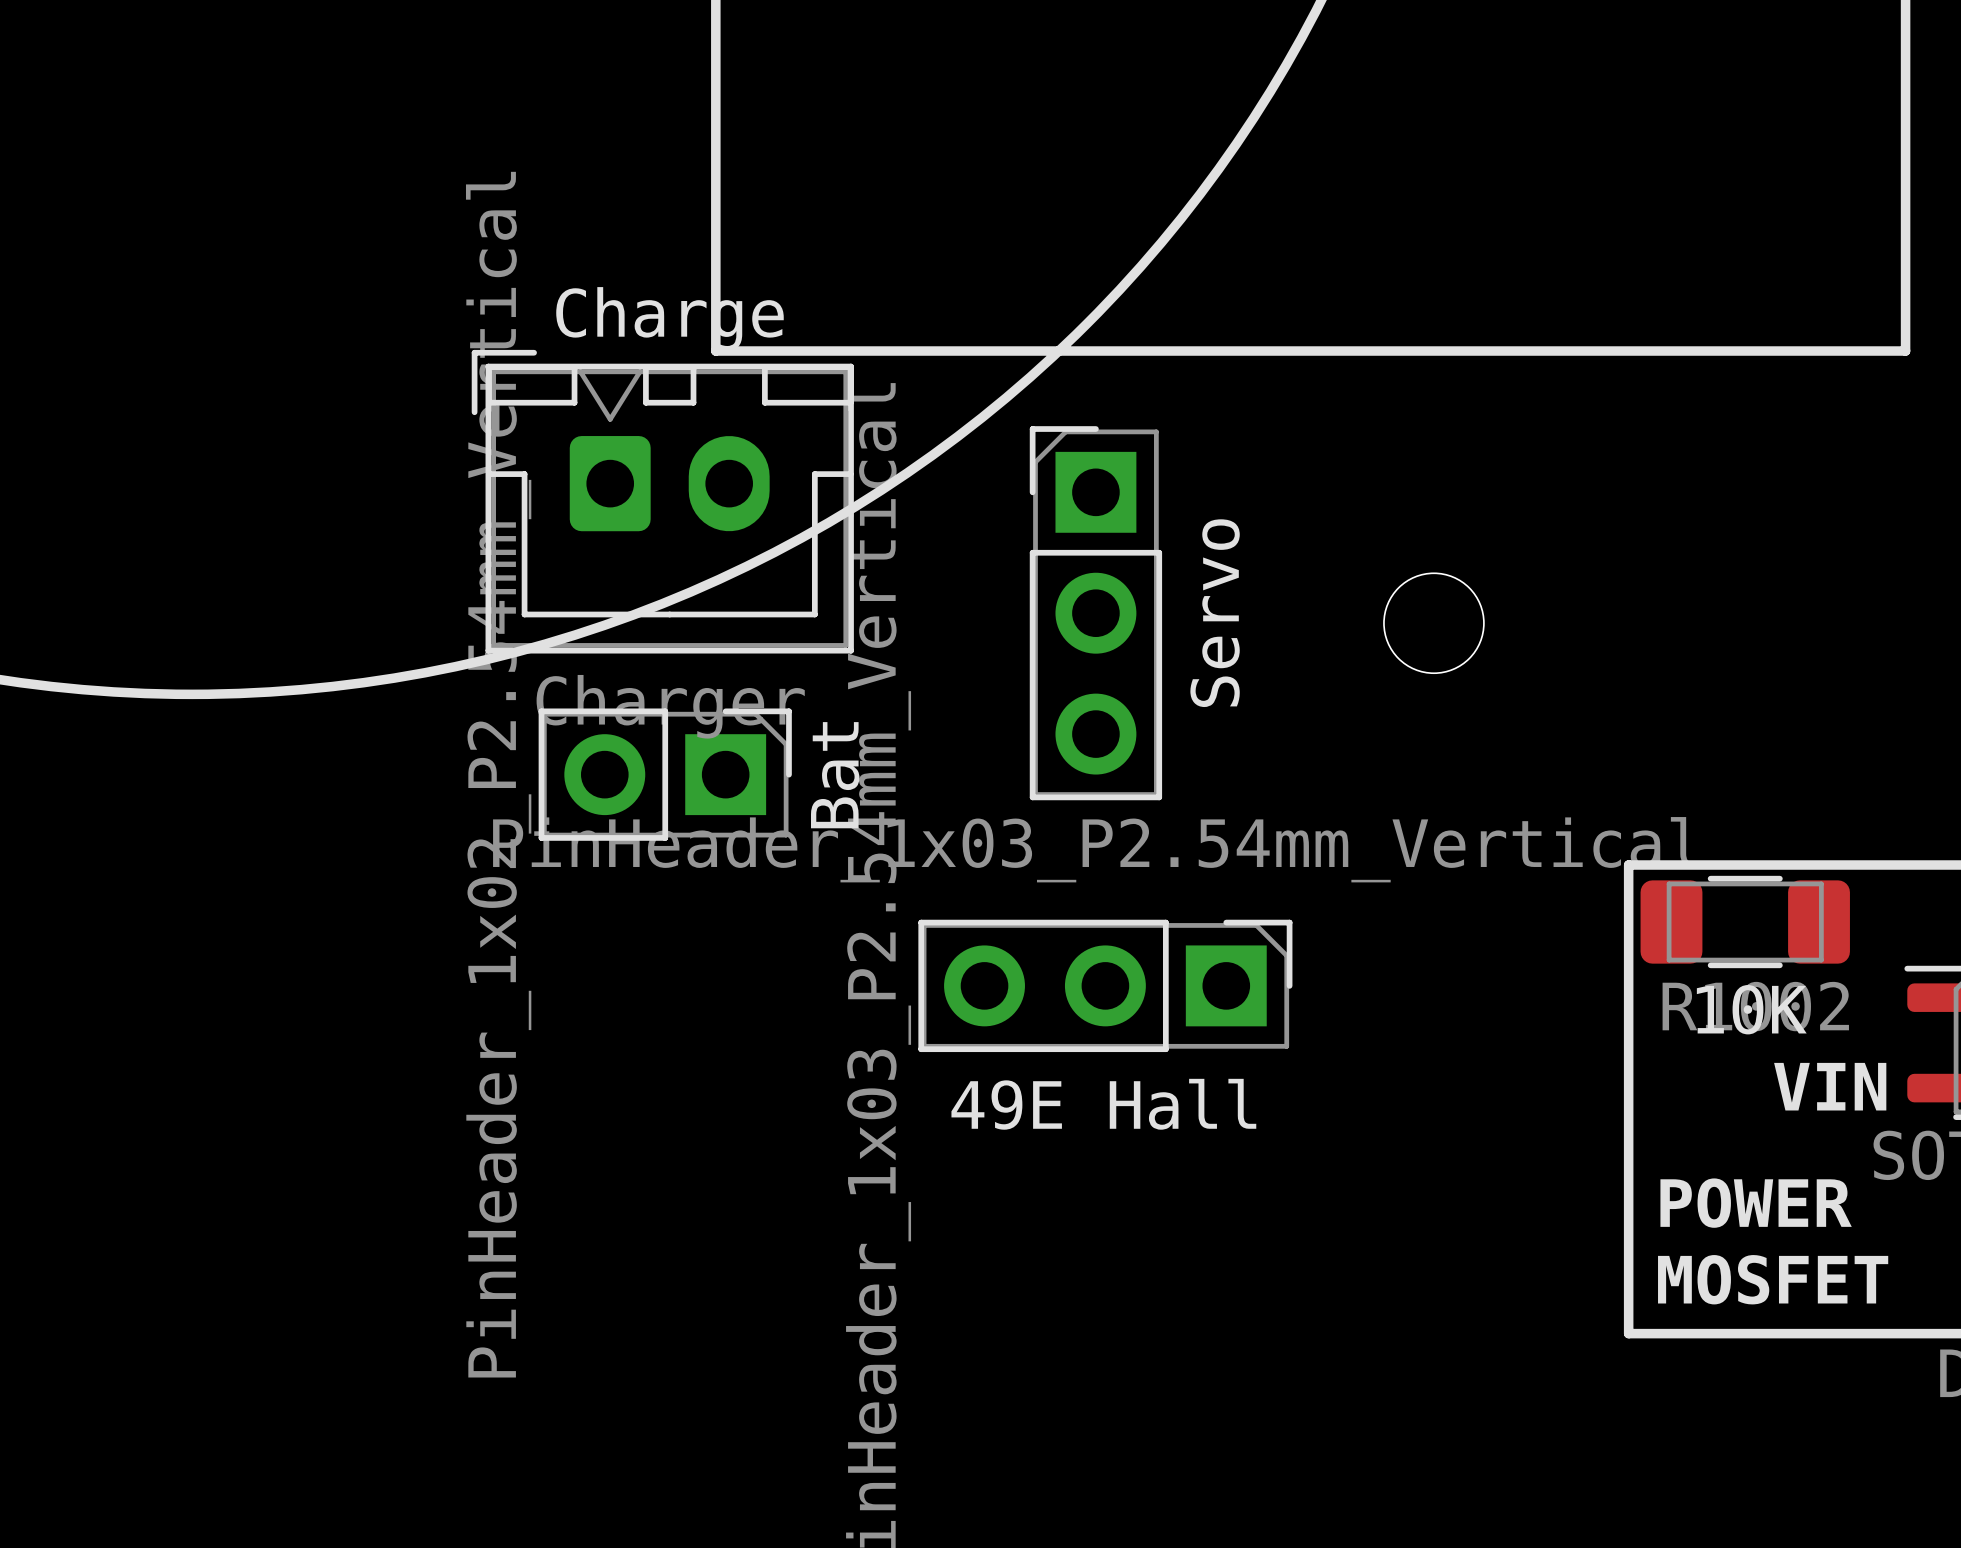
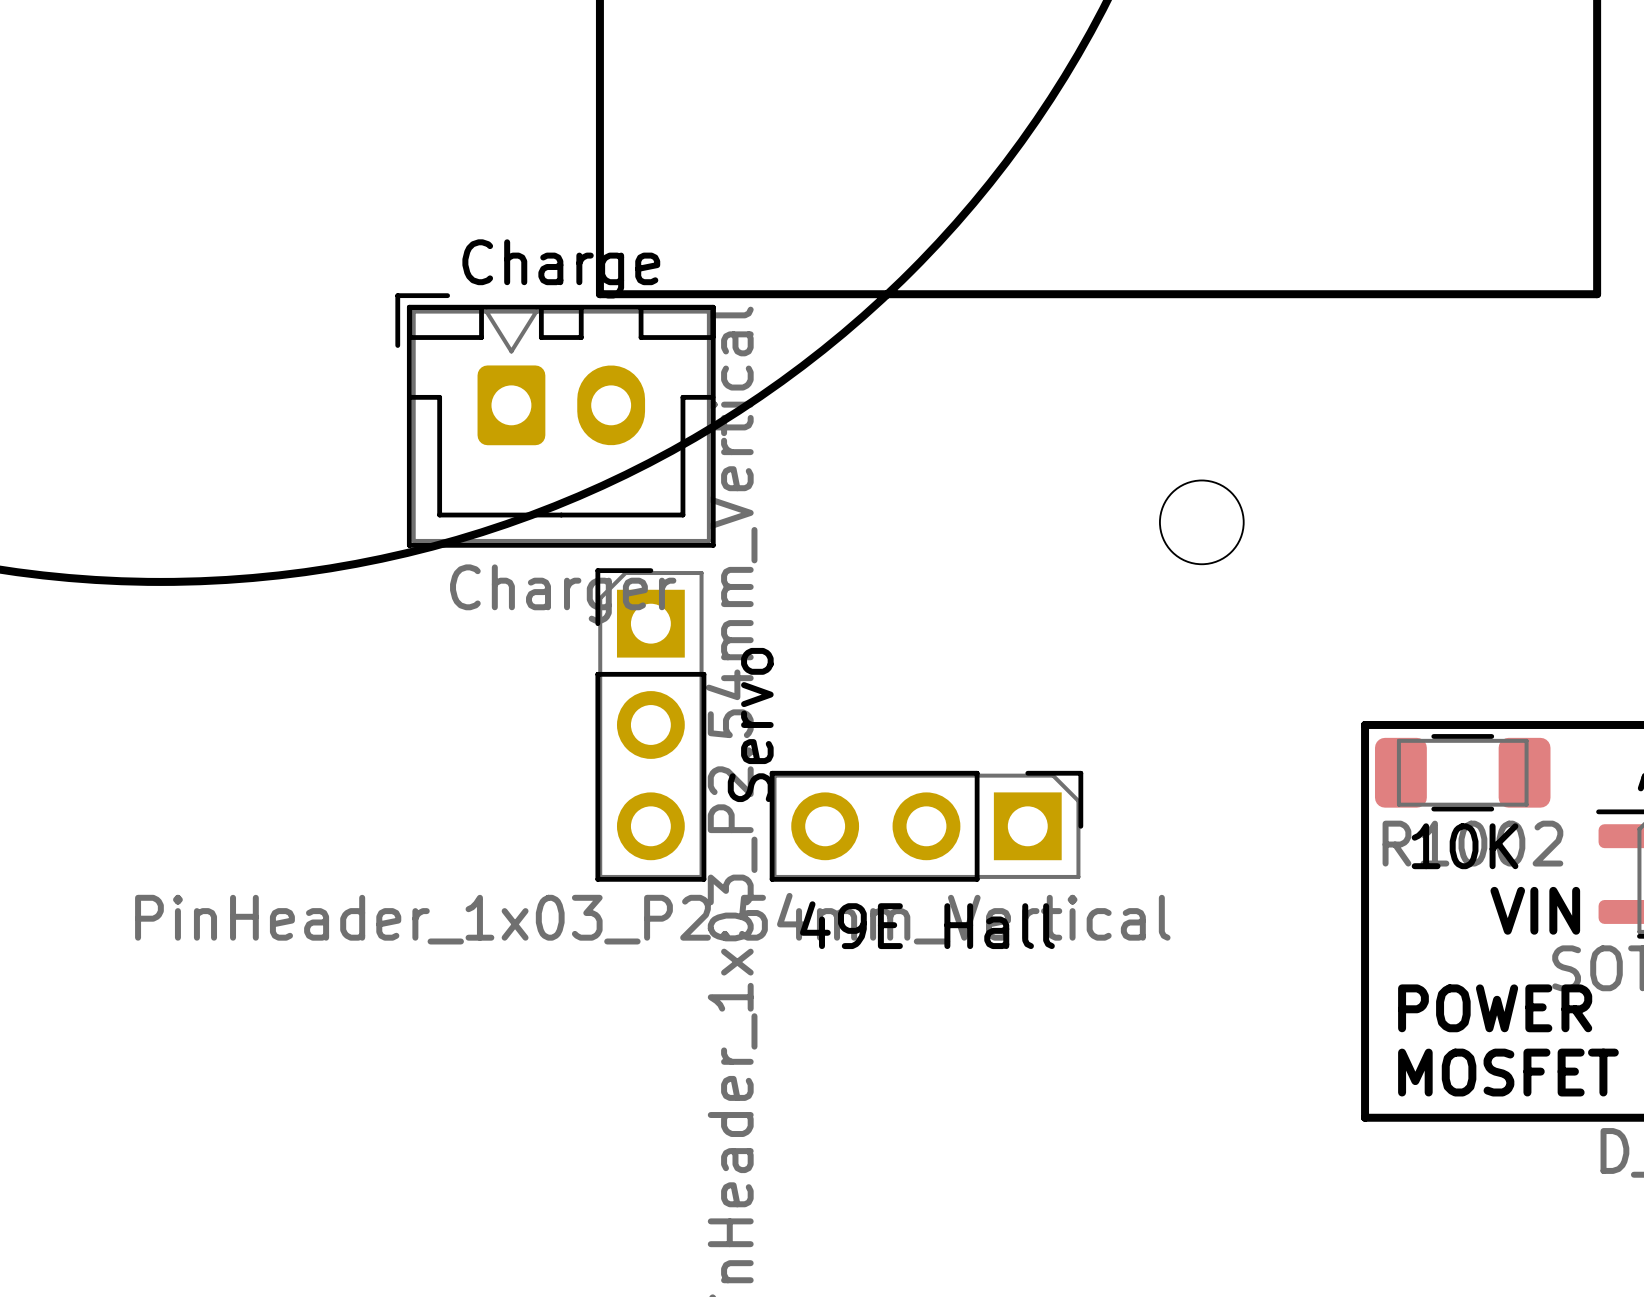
Servo position: (1095, 613) -> (650, 724)
Bat: PinHeader_1x02_P2.54mm_Vertical (665, 774) -> none

